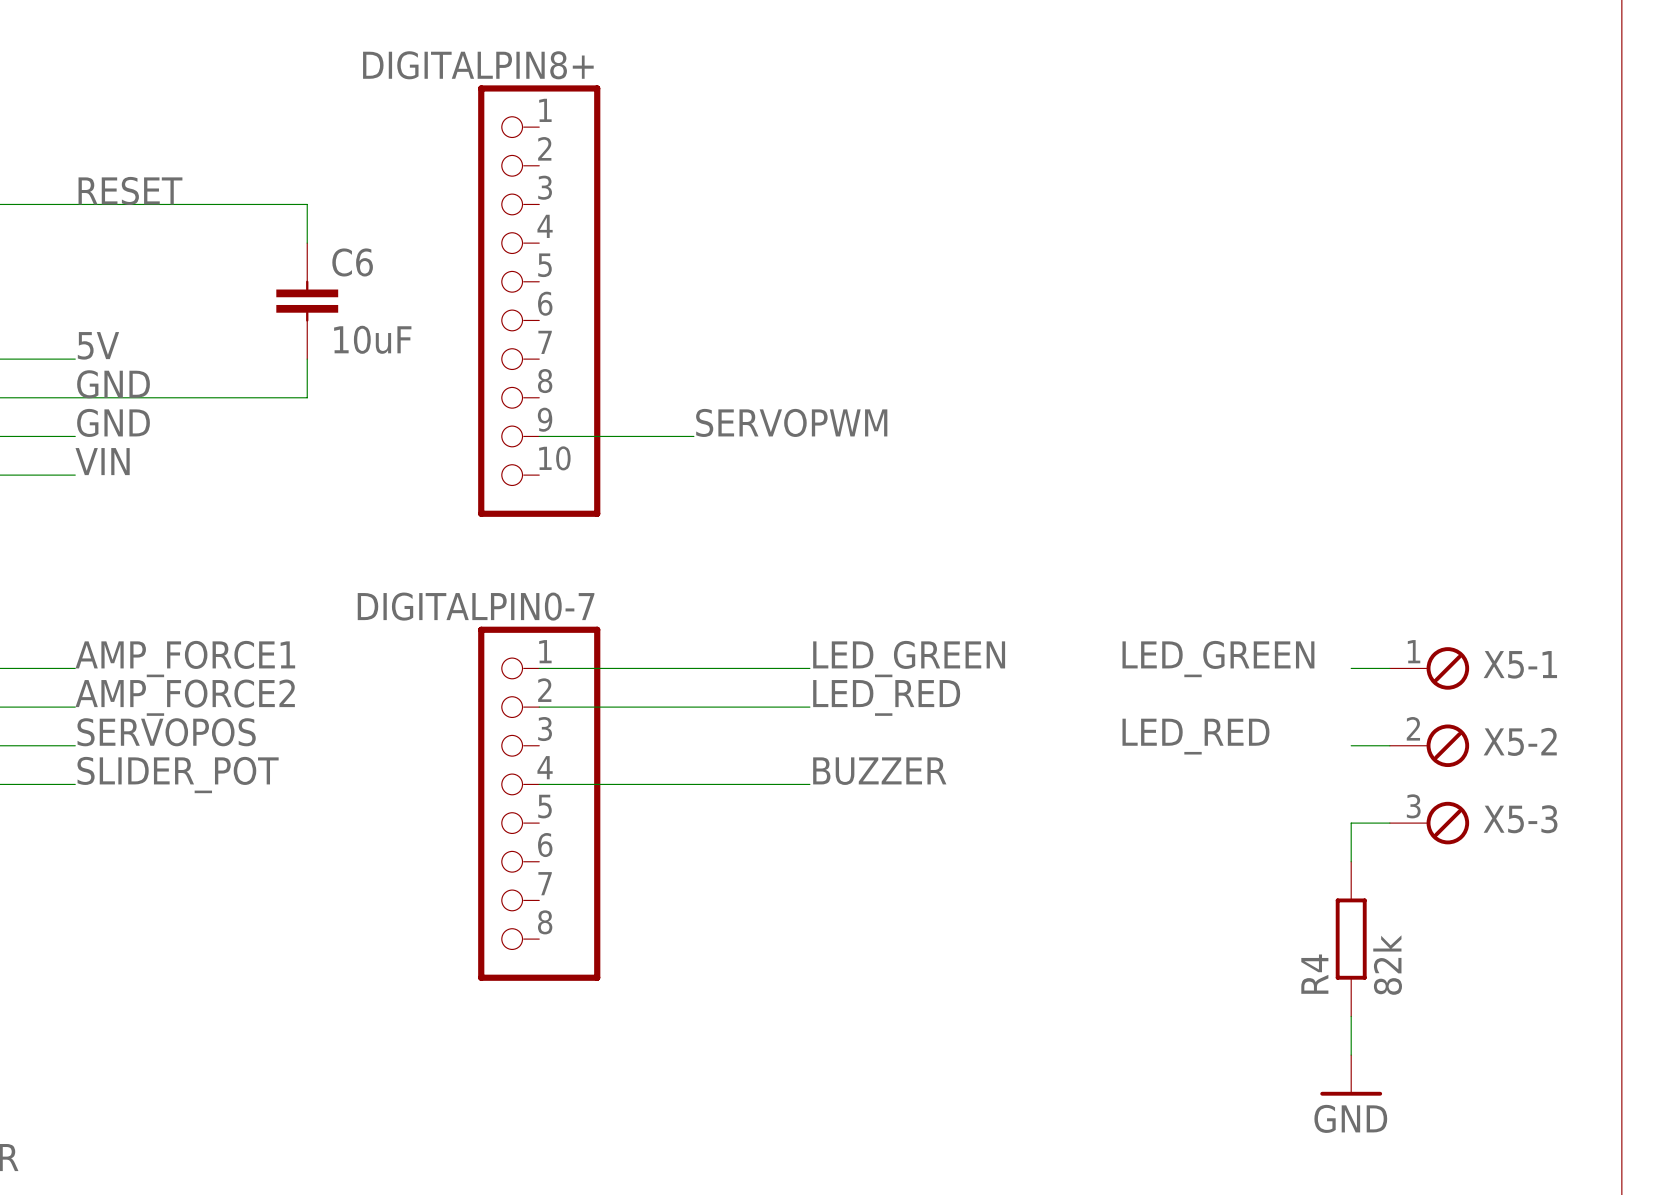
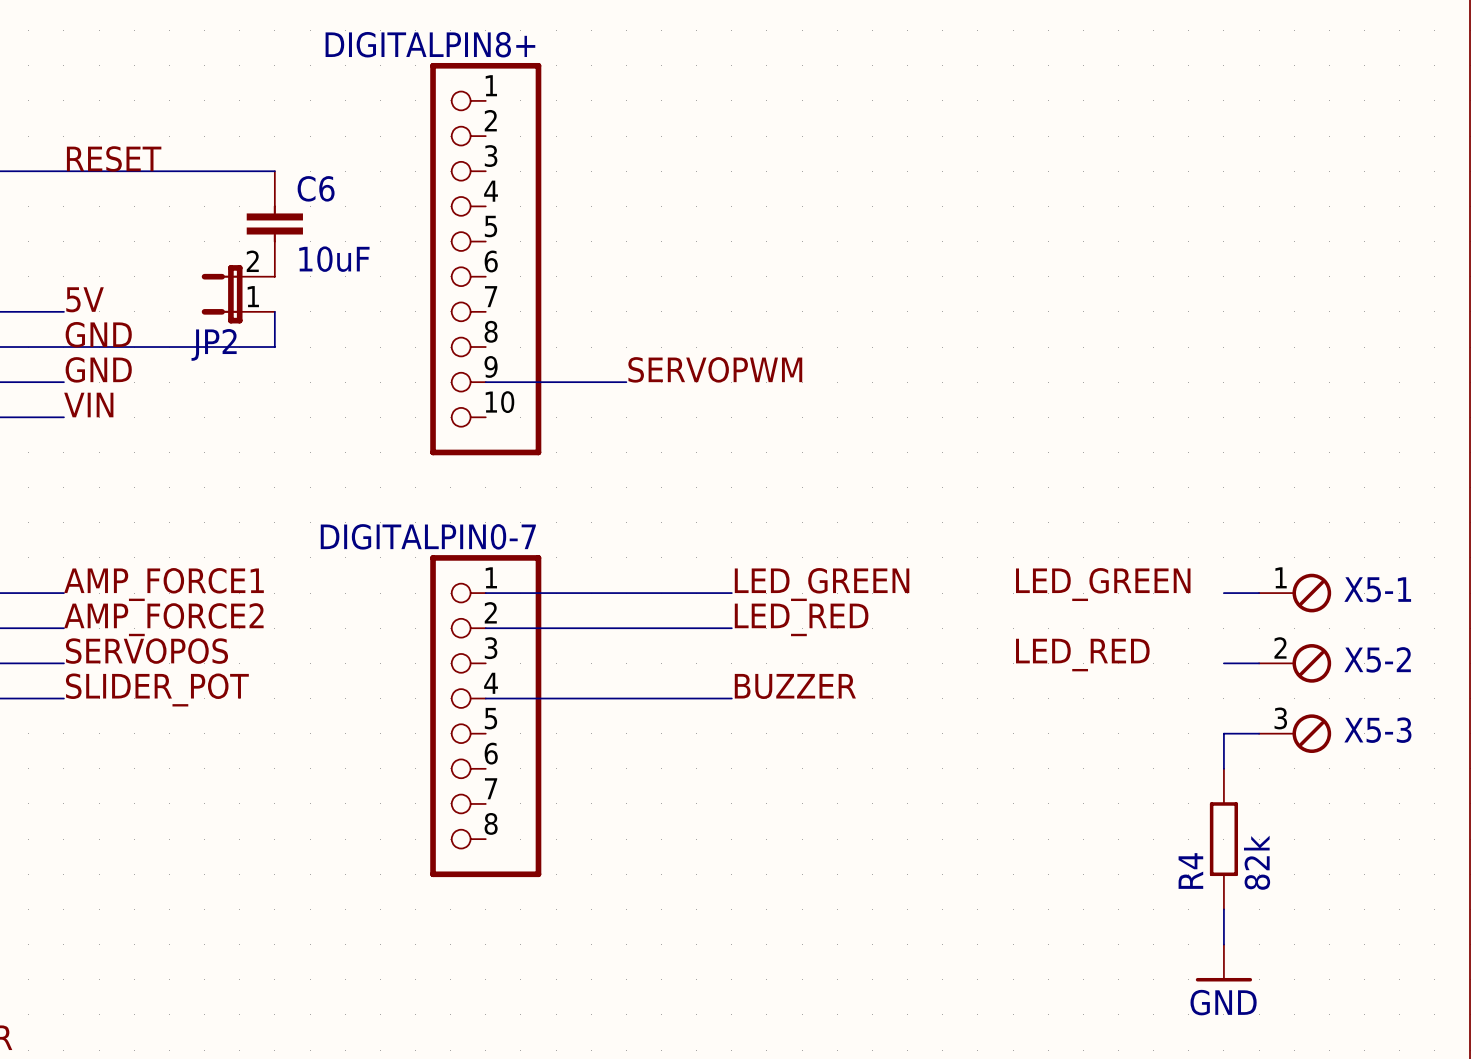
C6 position: (307, 301) -> (274, 223)
JP2: none -> (238, 294)

